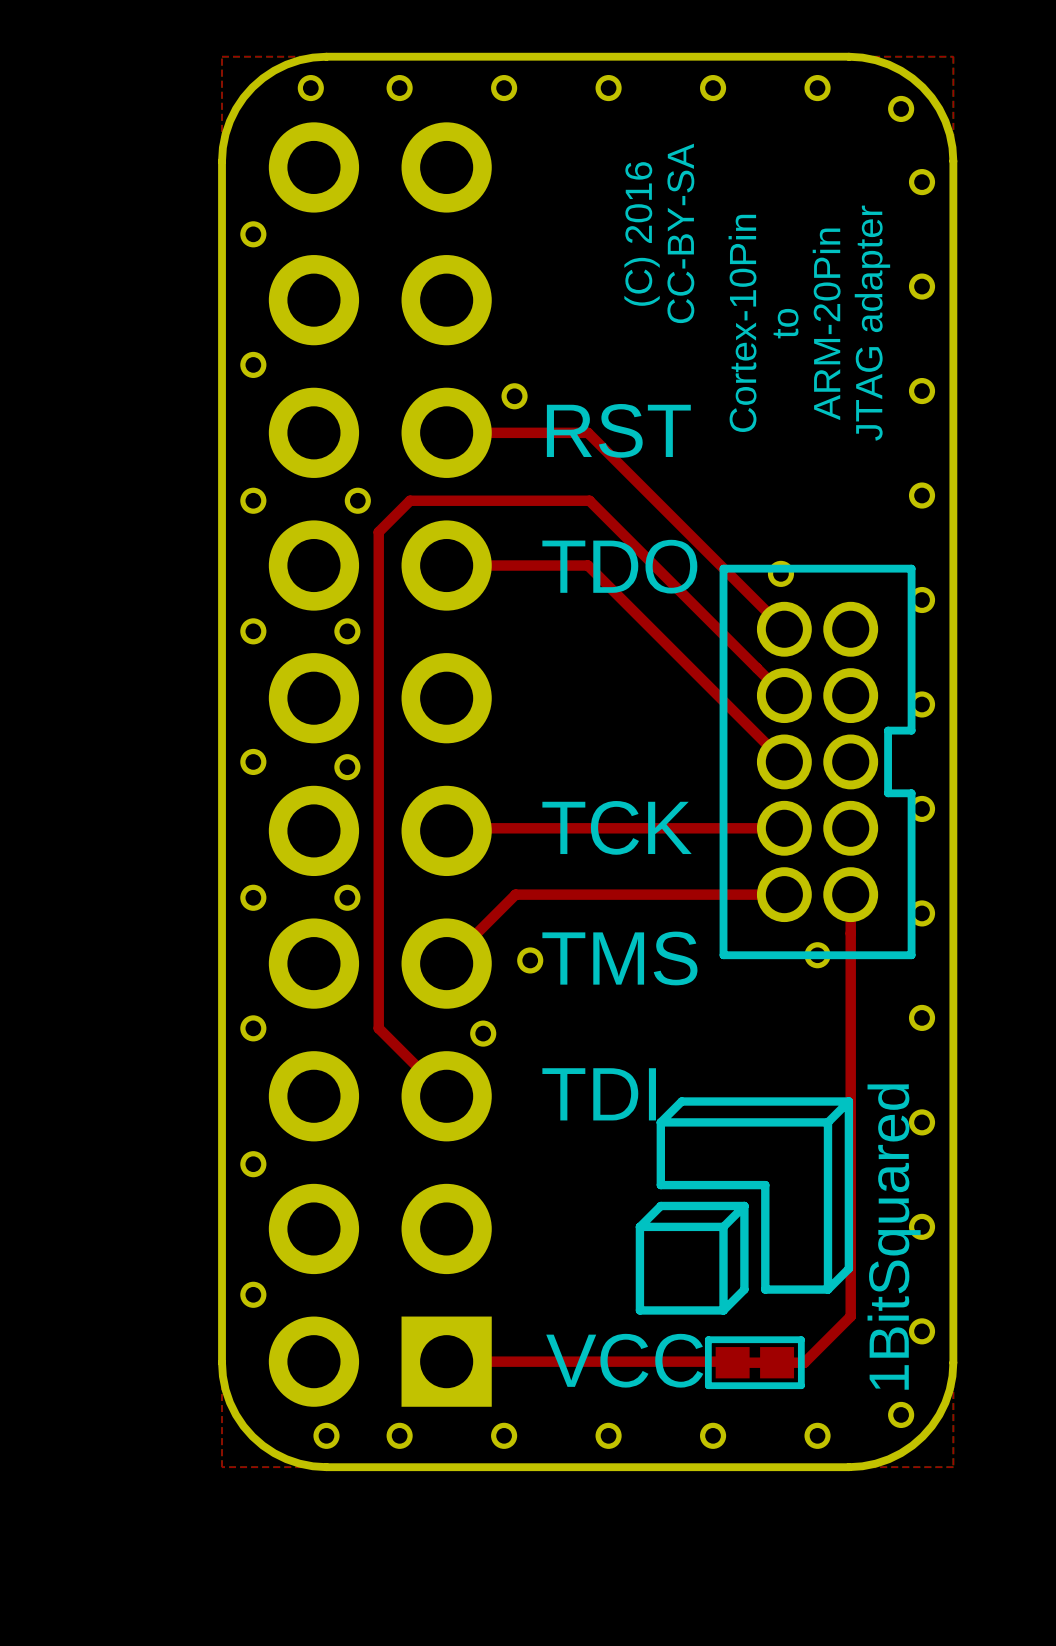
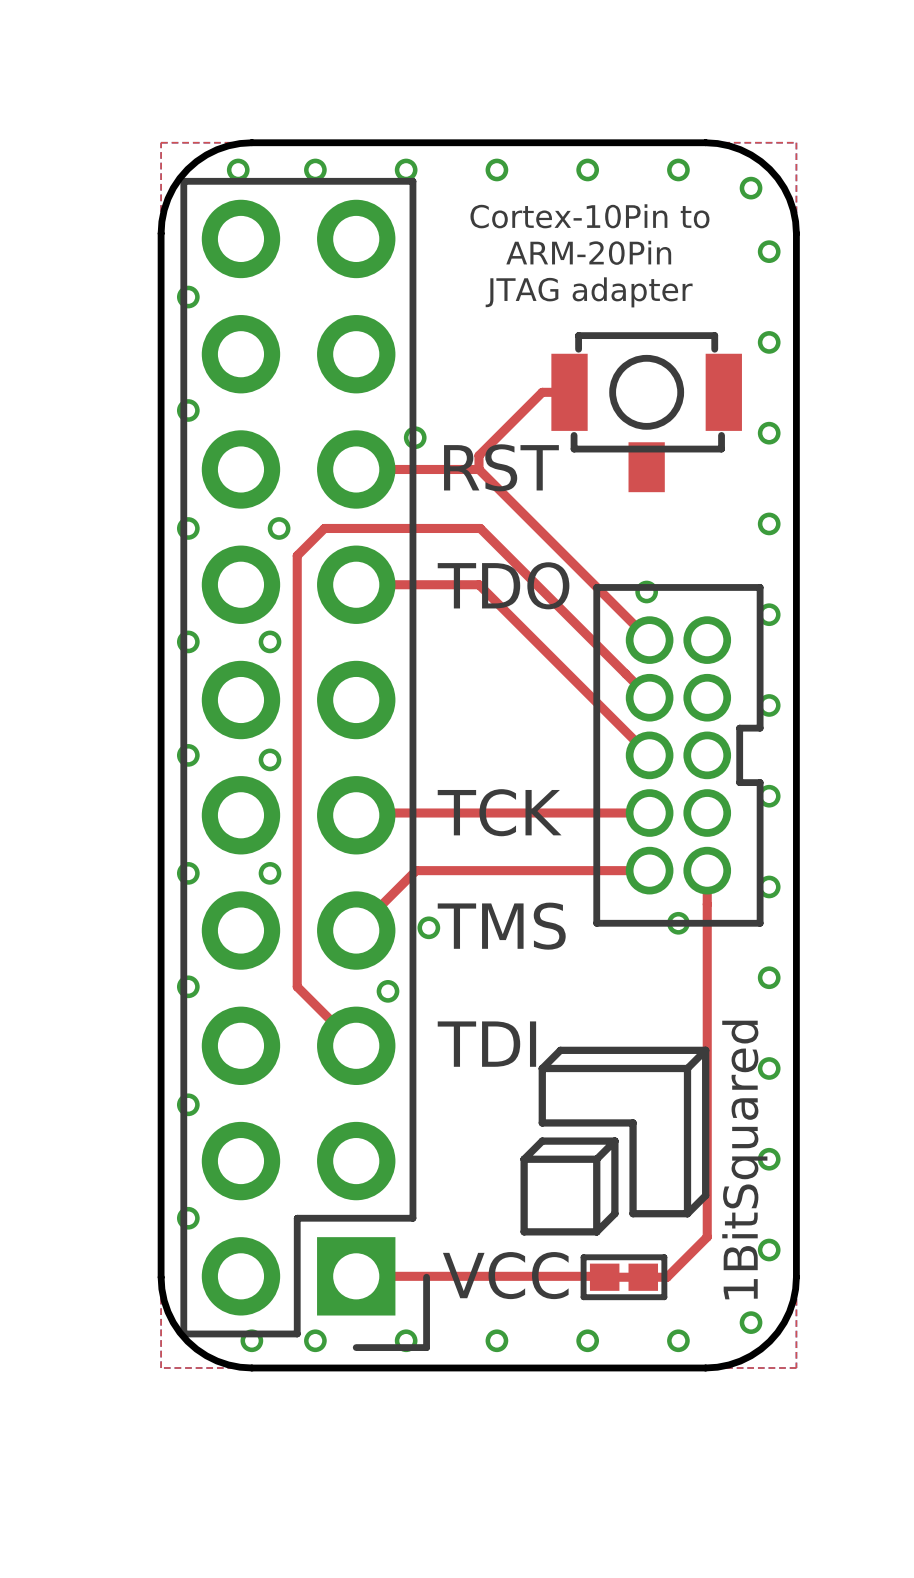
line: none -> (183, 181) (183, 1333) (297, 1333) (297, 1218) (412, 1218) (412, 181) (183, 181)
text: (C) 2016 (642, 233) -> none
text: CC-BY-SA (680, 233) -> none
text: Cortex-10Pin (742, 323) -> Cortex-10Pin to (589, 216)
text: to (786, 323) -> none
text rotation: 0° (872, 323) -> 90° clockwise (589, 292)
text rotation: 0° (826, 324) -> 90° clockwise (588, 252)
top track: none -> (569, 392) (542, 392) (478, 455) (478, 469)
part: none -> (646, 412)
line: none -> (426, 1277) (426, 1347) (356, 1347)

